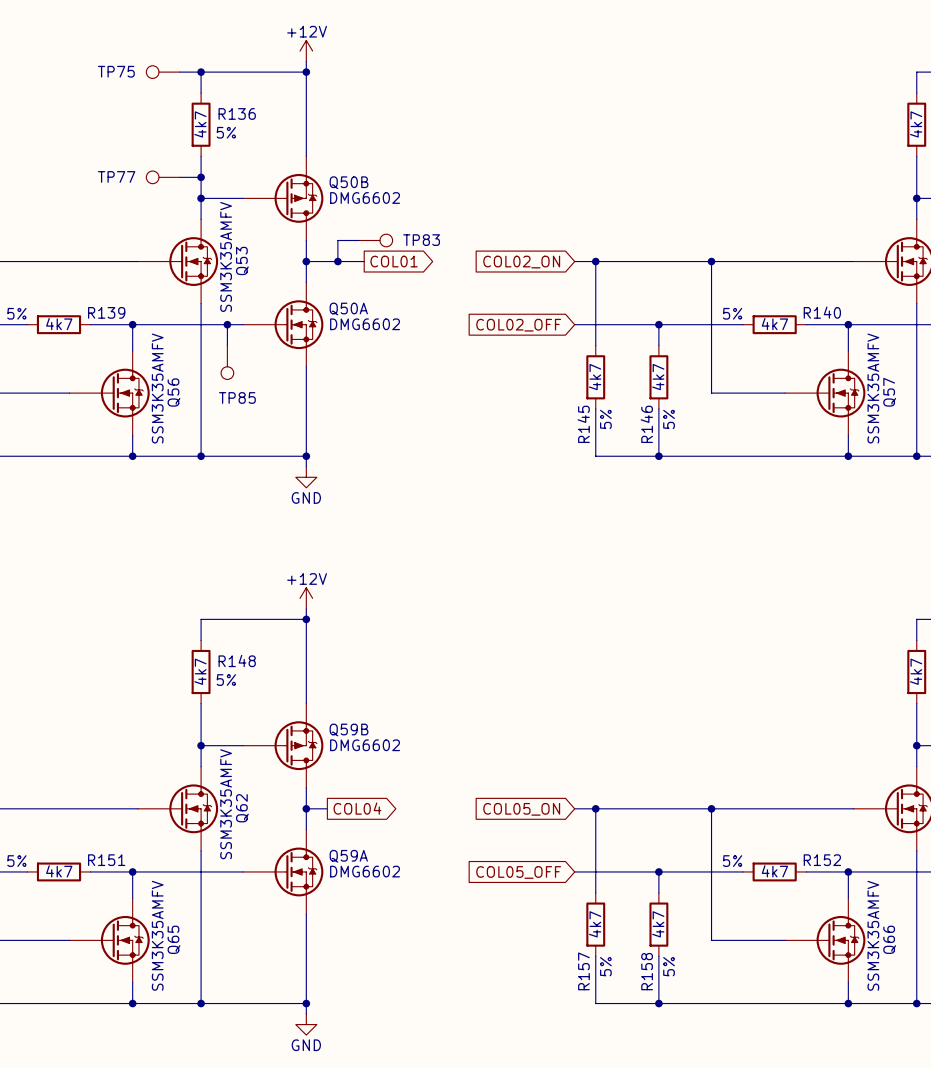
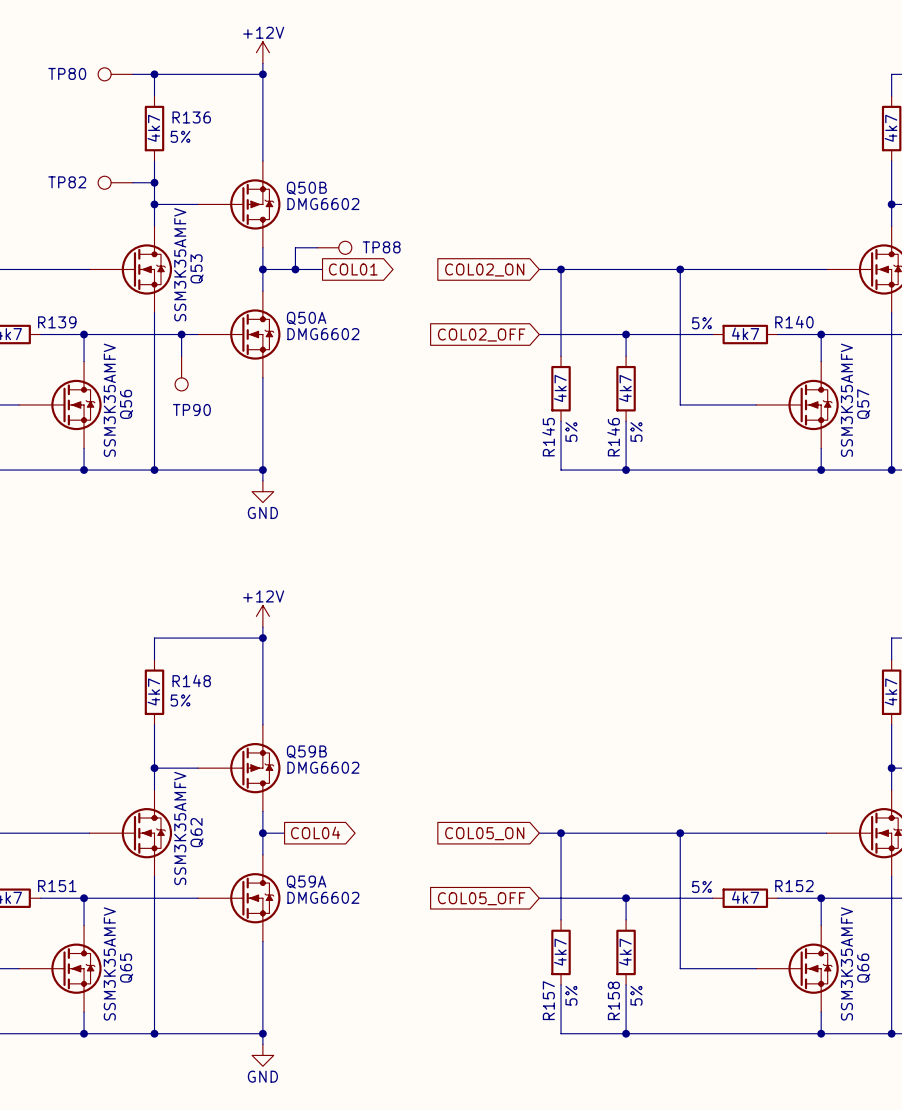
TP75 name: TP75 (116, 71) -> TP80 (67, 73)
TP77 name: TP77 (116, 176) -> TP82 (67, 182)
TP83 name: TP83 (421, 240) -> TP88 (381, 247)
TP85 name: TP85 (237, 397) -> TP90 (191, 410)

